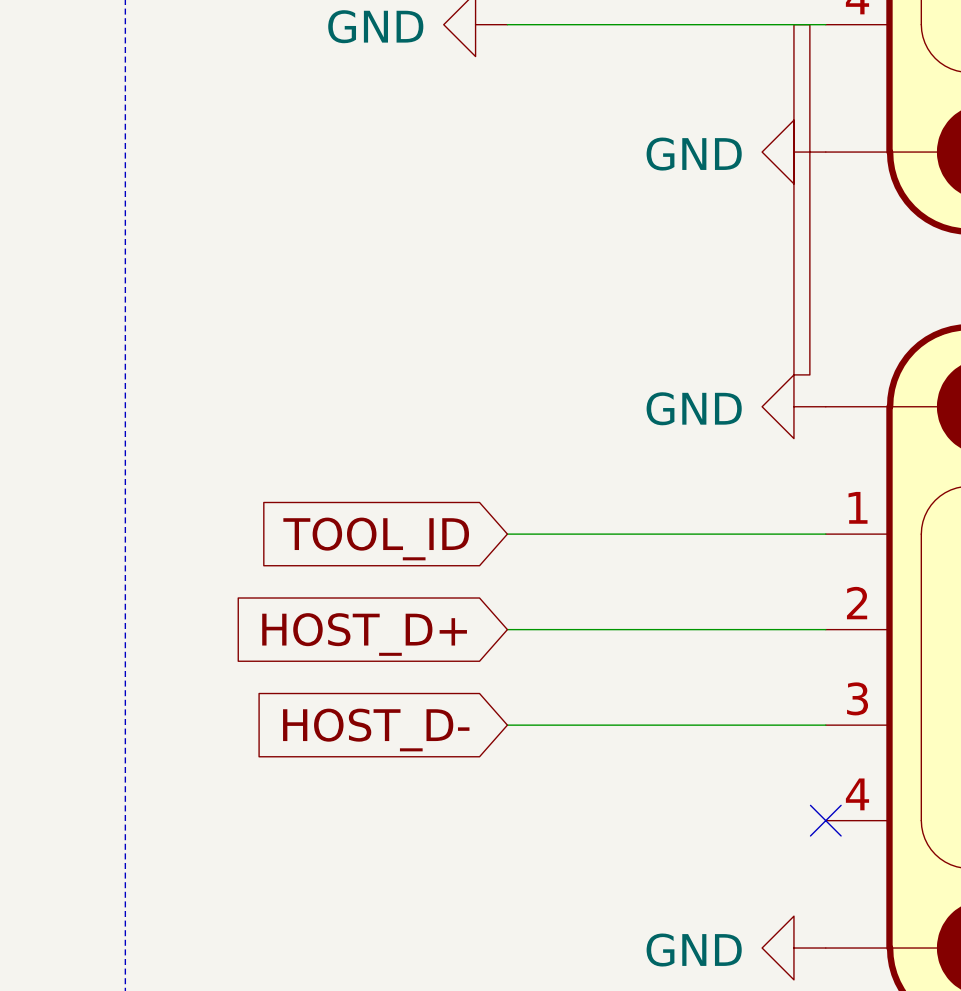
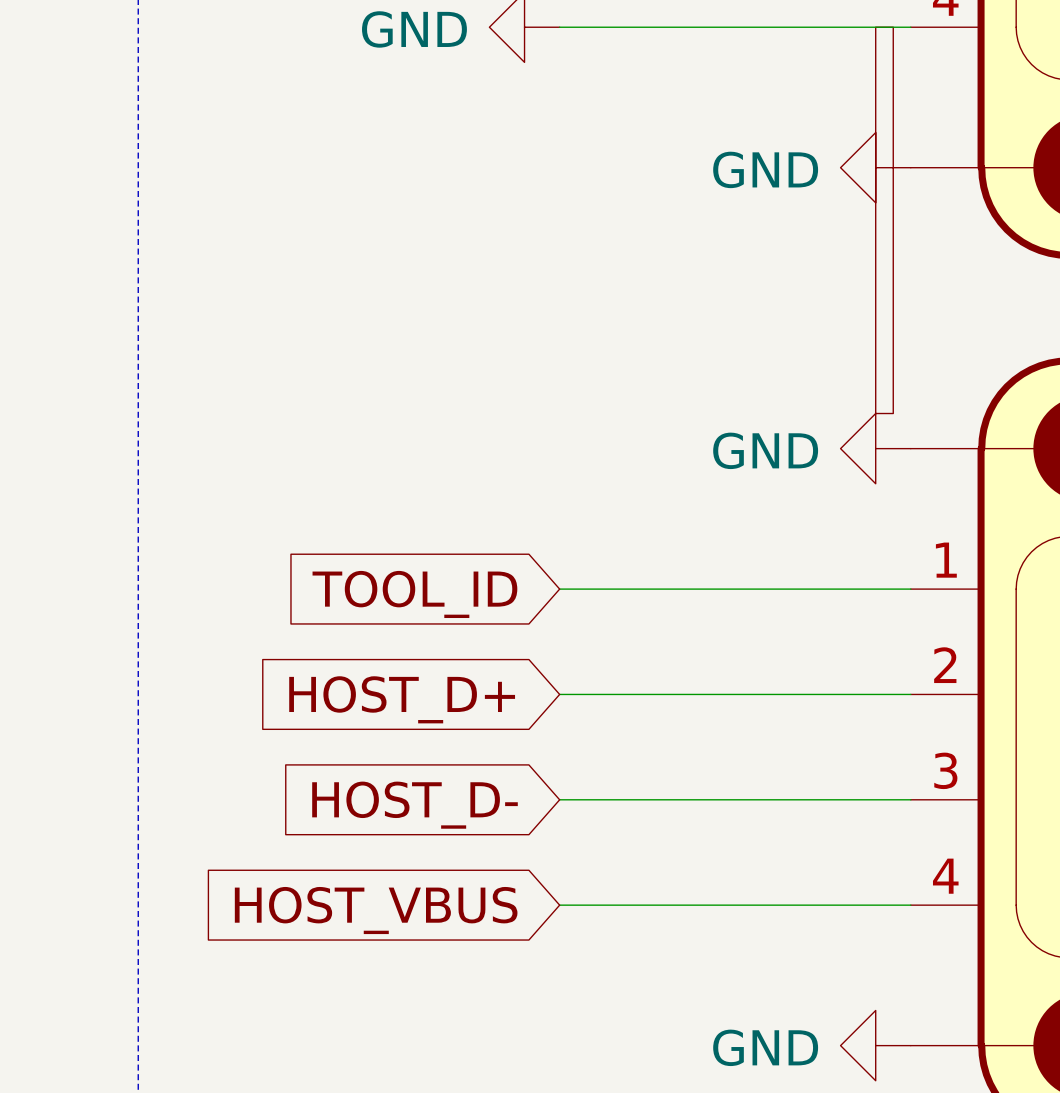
wire: none -> (559, 905) (910, 905)
no-connect mark: (825, 820) -> none
global label: none -> HOST_VBUS (376, 910)

